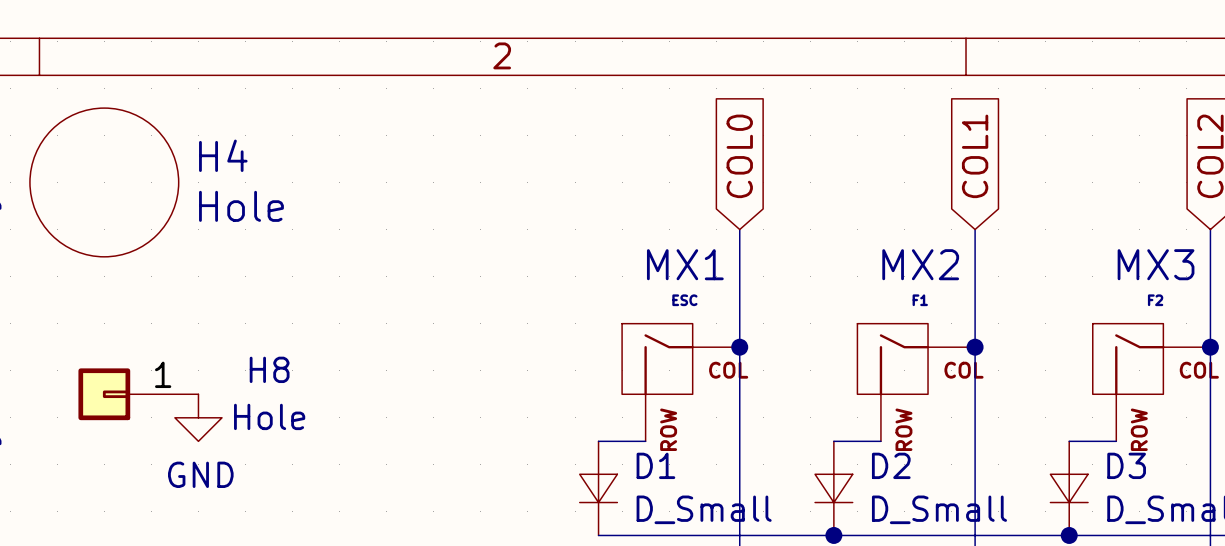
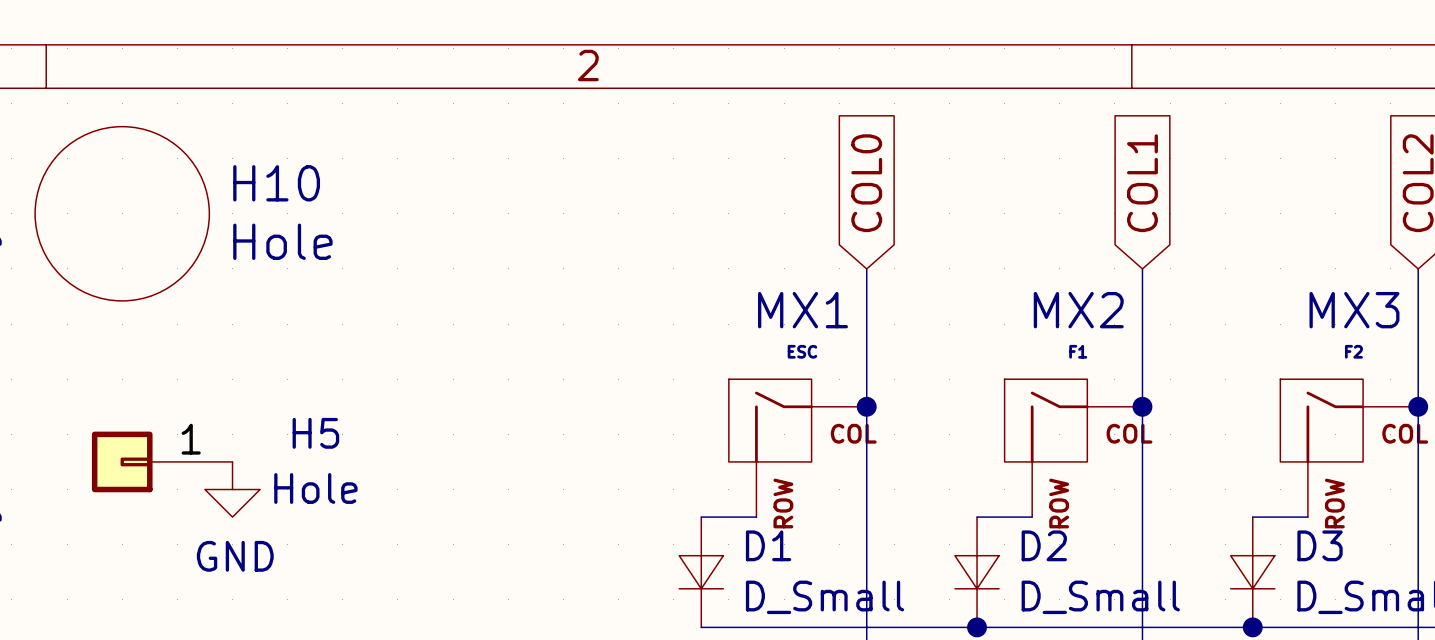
H4 name: H4 (223, 155) -> H10 (276, 183)
H8 name: H8 (269, 369) -> H5 (315, 433)

